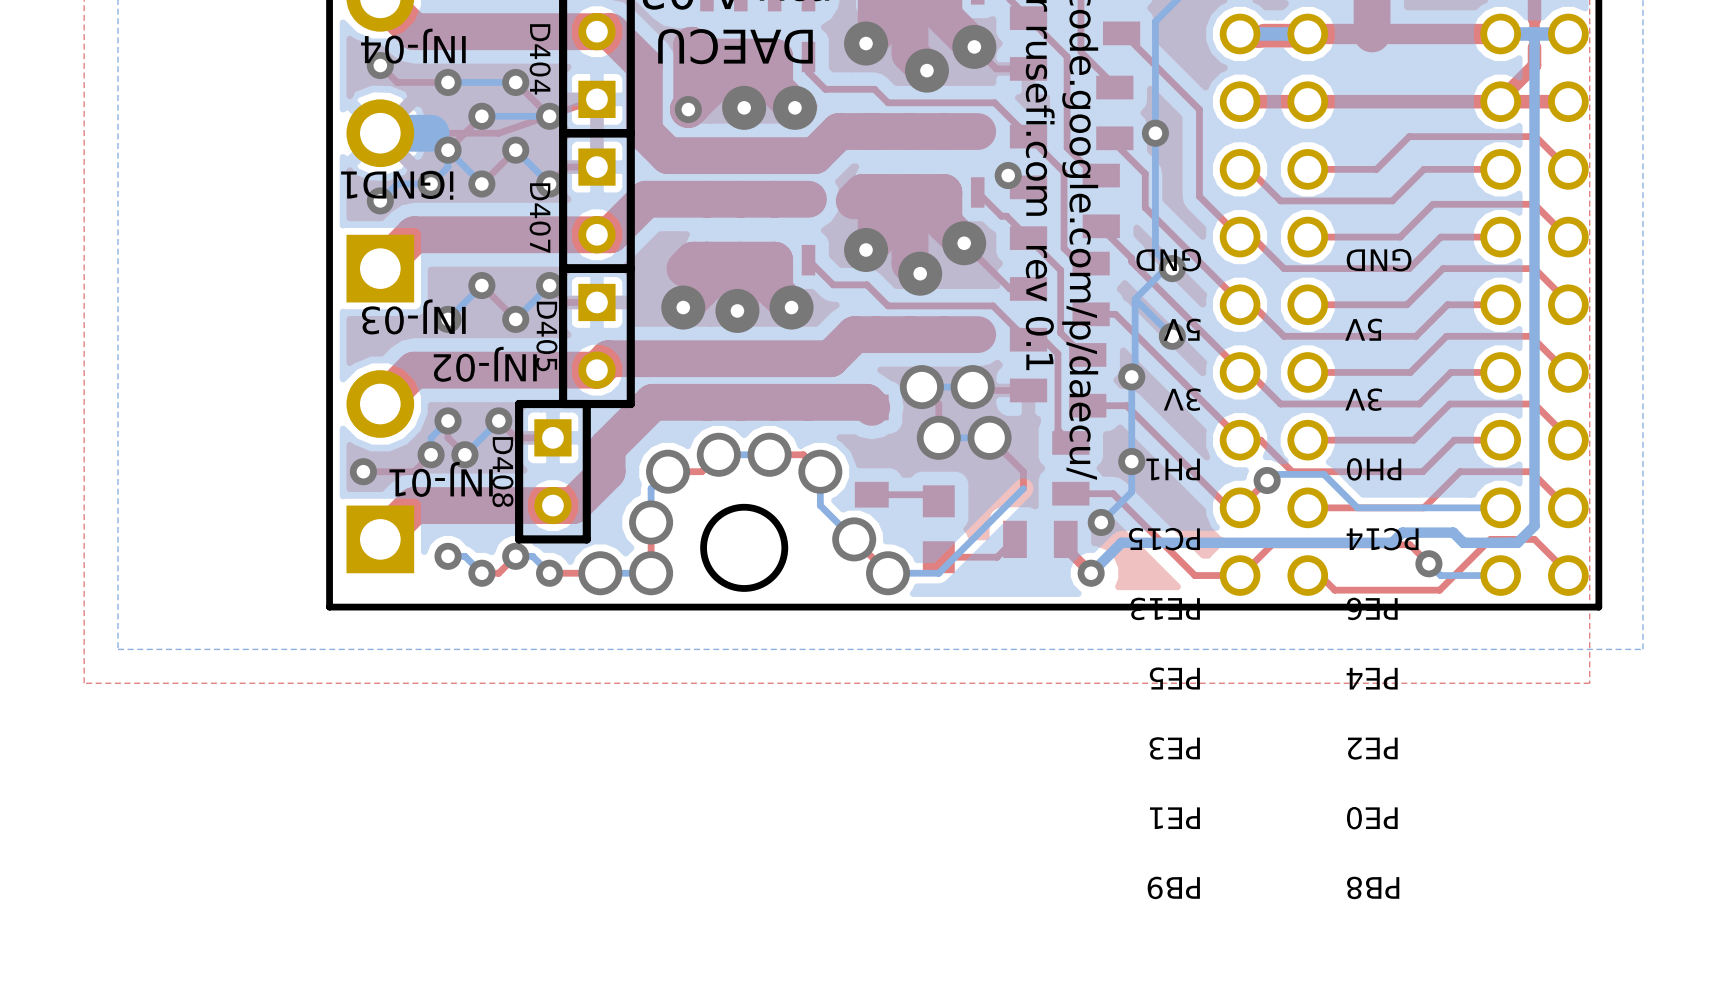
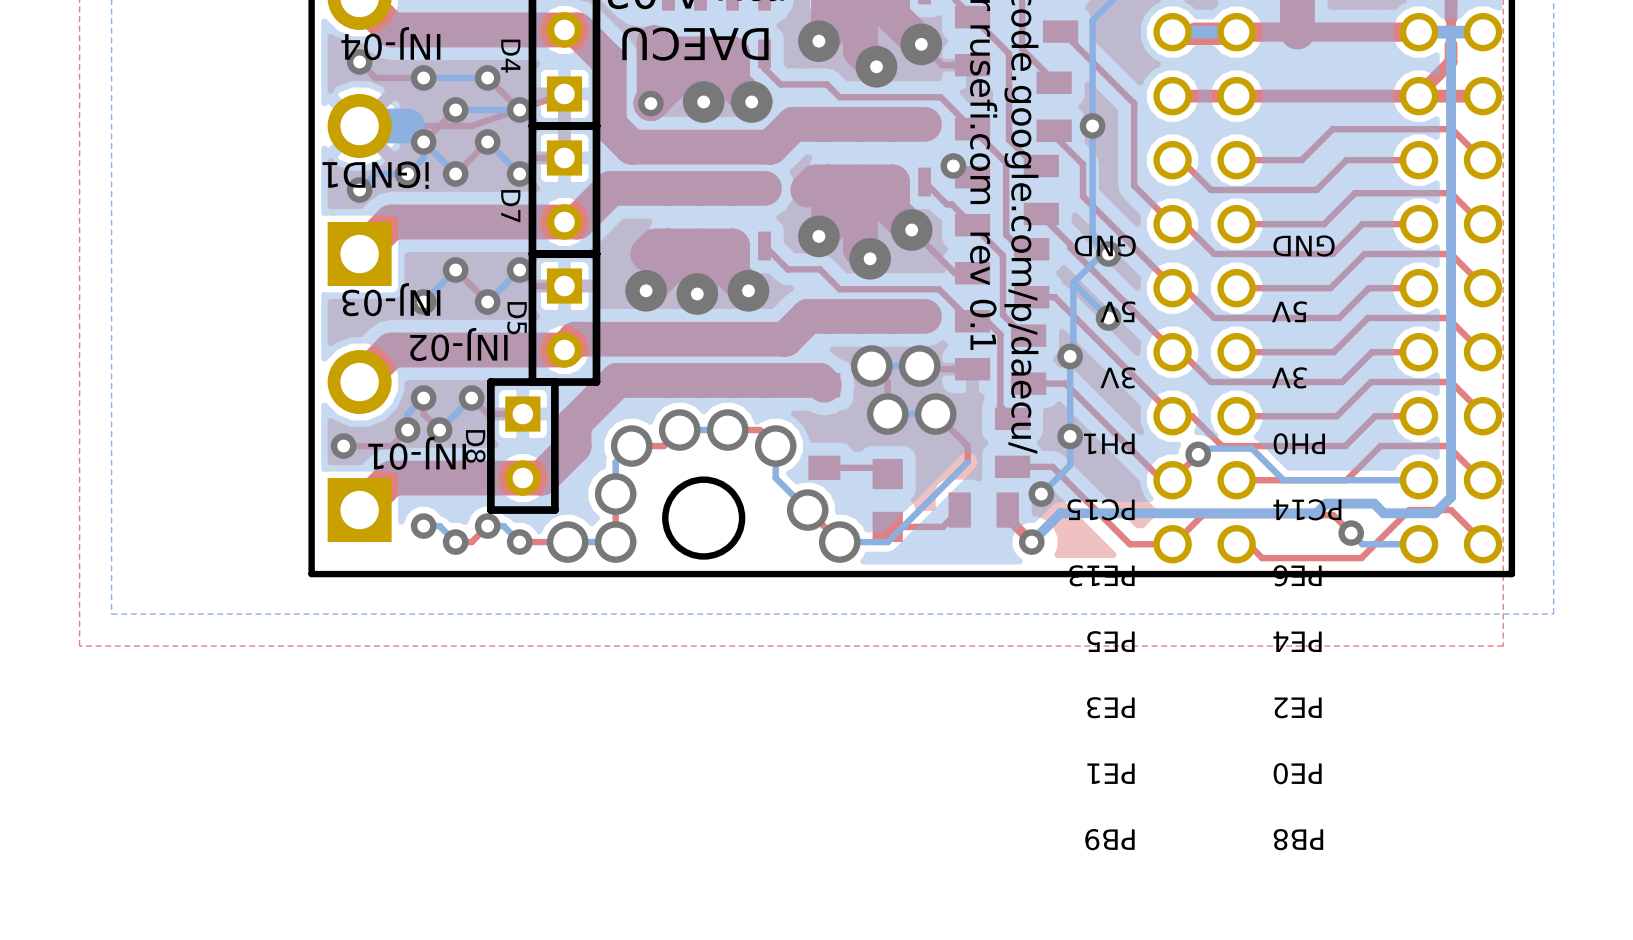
D404 name: D404 (540, 59) -> D4 (510, 56)
D407 name: D407 (540, 218) -> D7 (510, 206)
D405 name: D405 (546, 336) -> D5 (516, 318)
D408 name: D408 (502, 472) -> D8 (475, 446)

